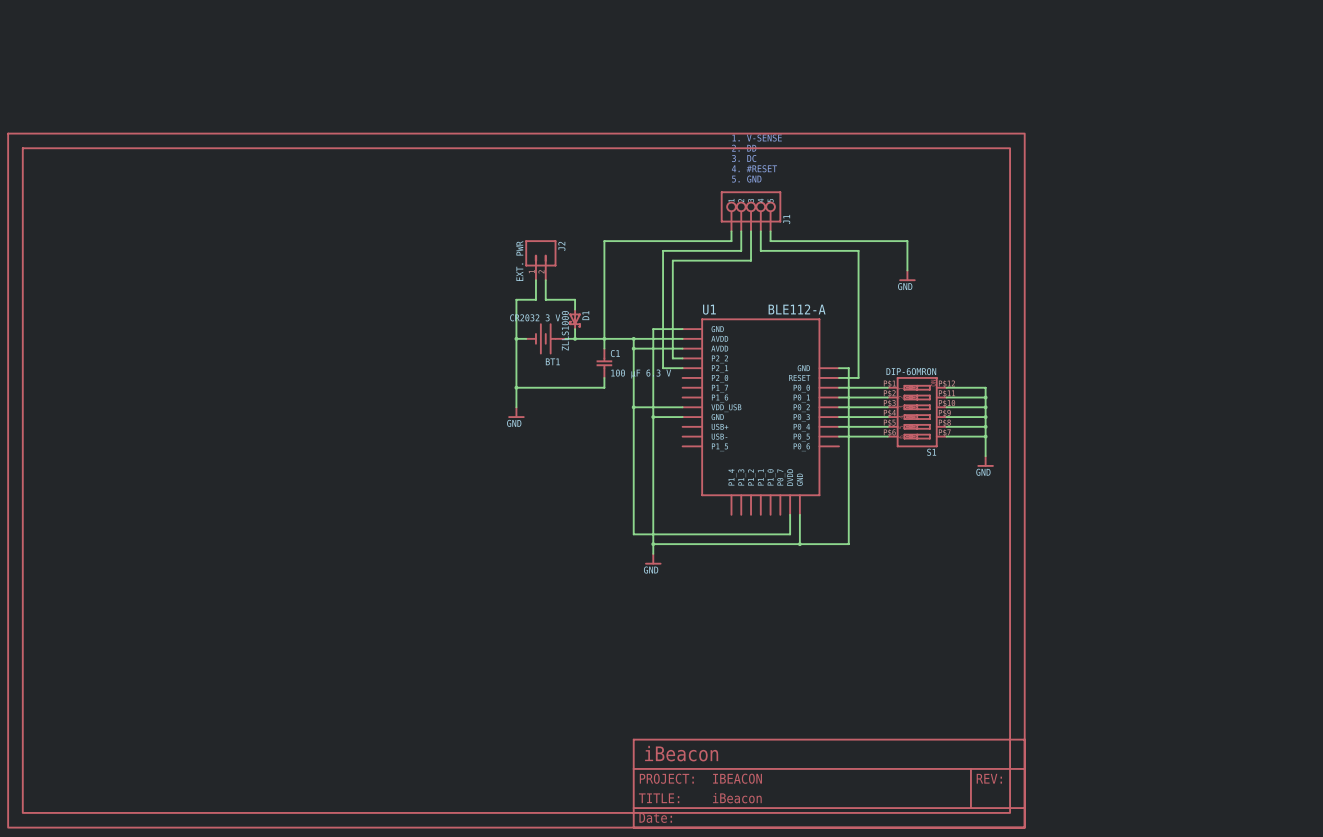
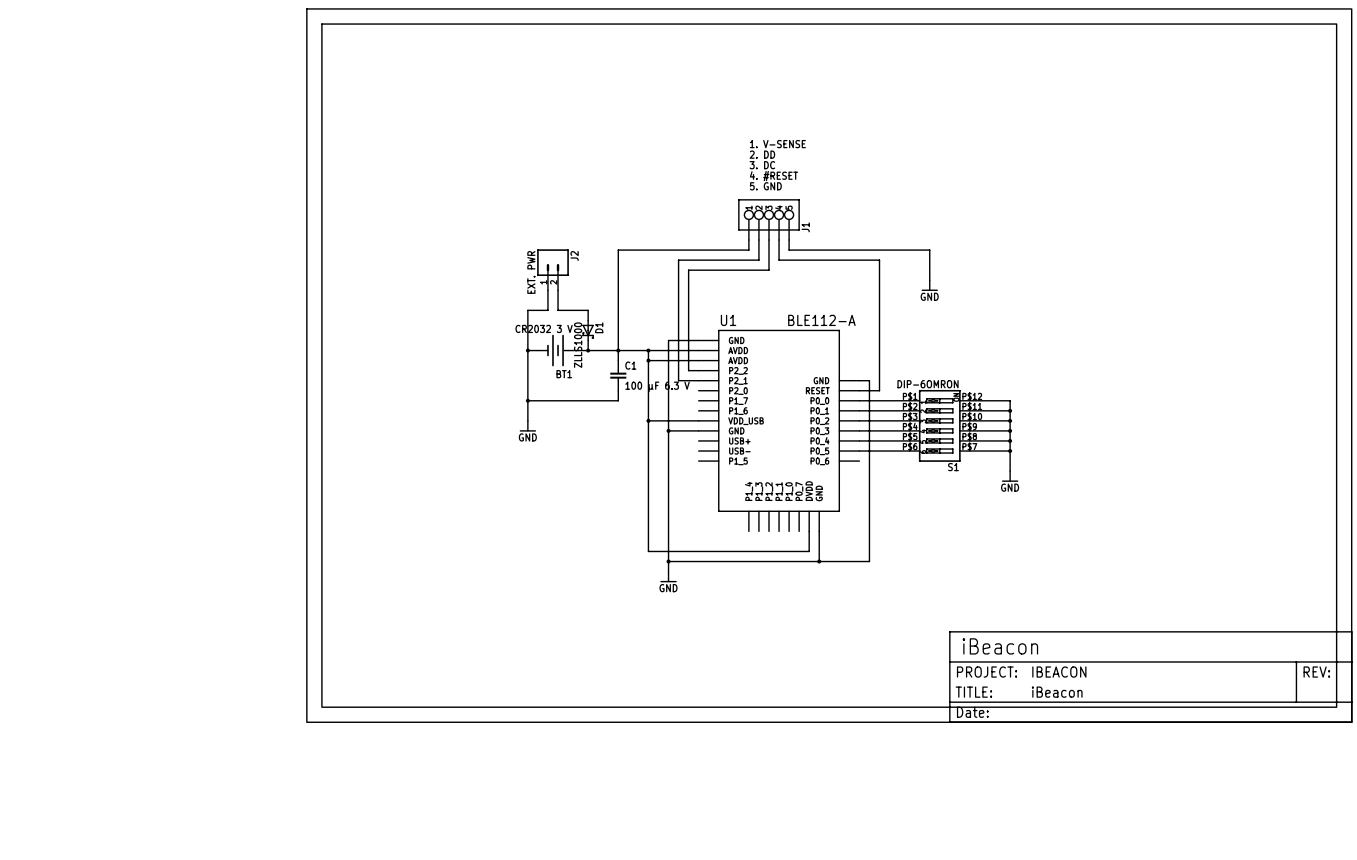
IBEACON: none -> iBeacon (829, 365)
IBEACON: iBeacon (516, 480) -> none

